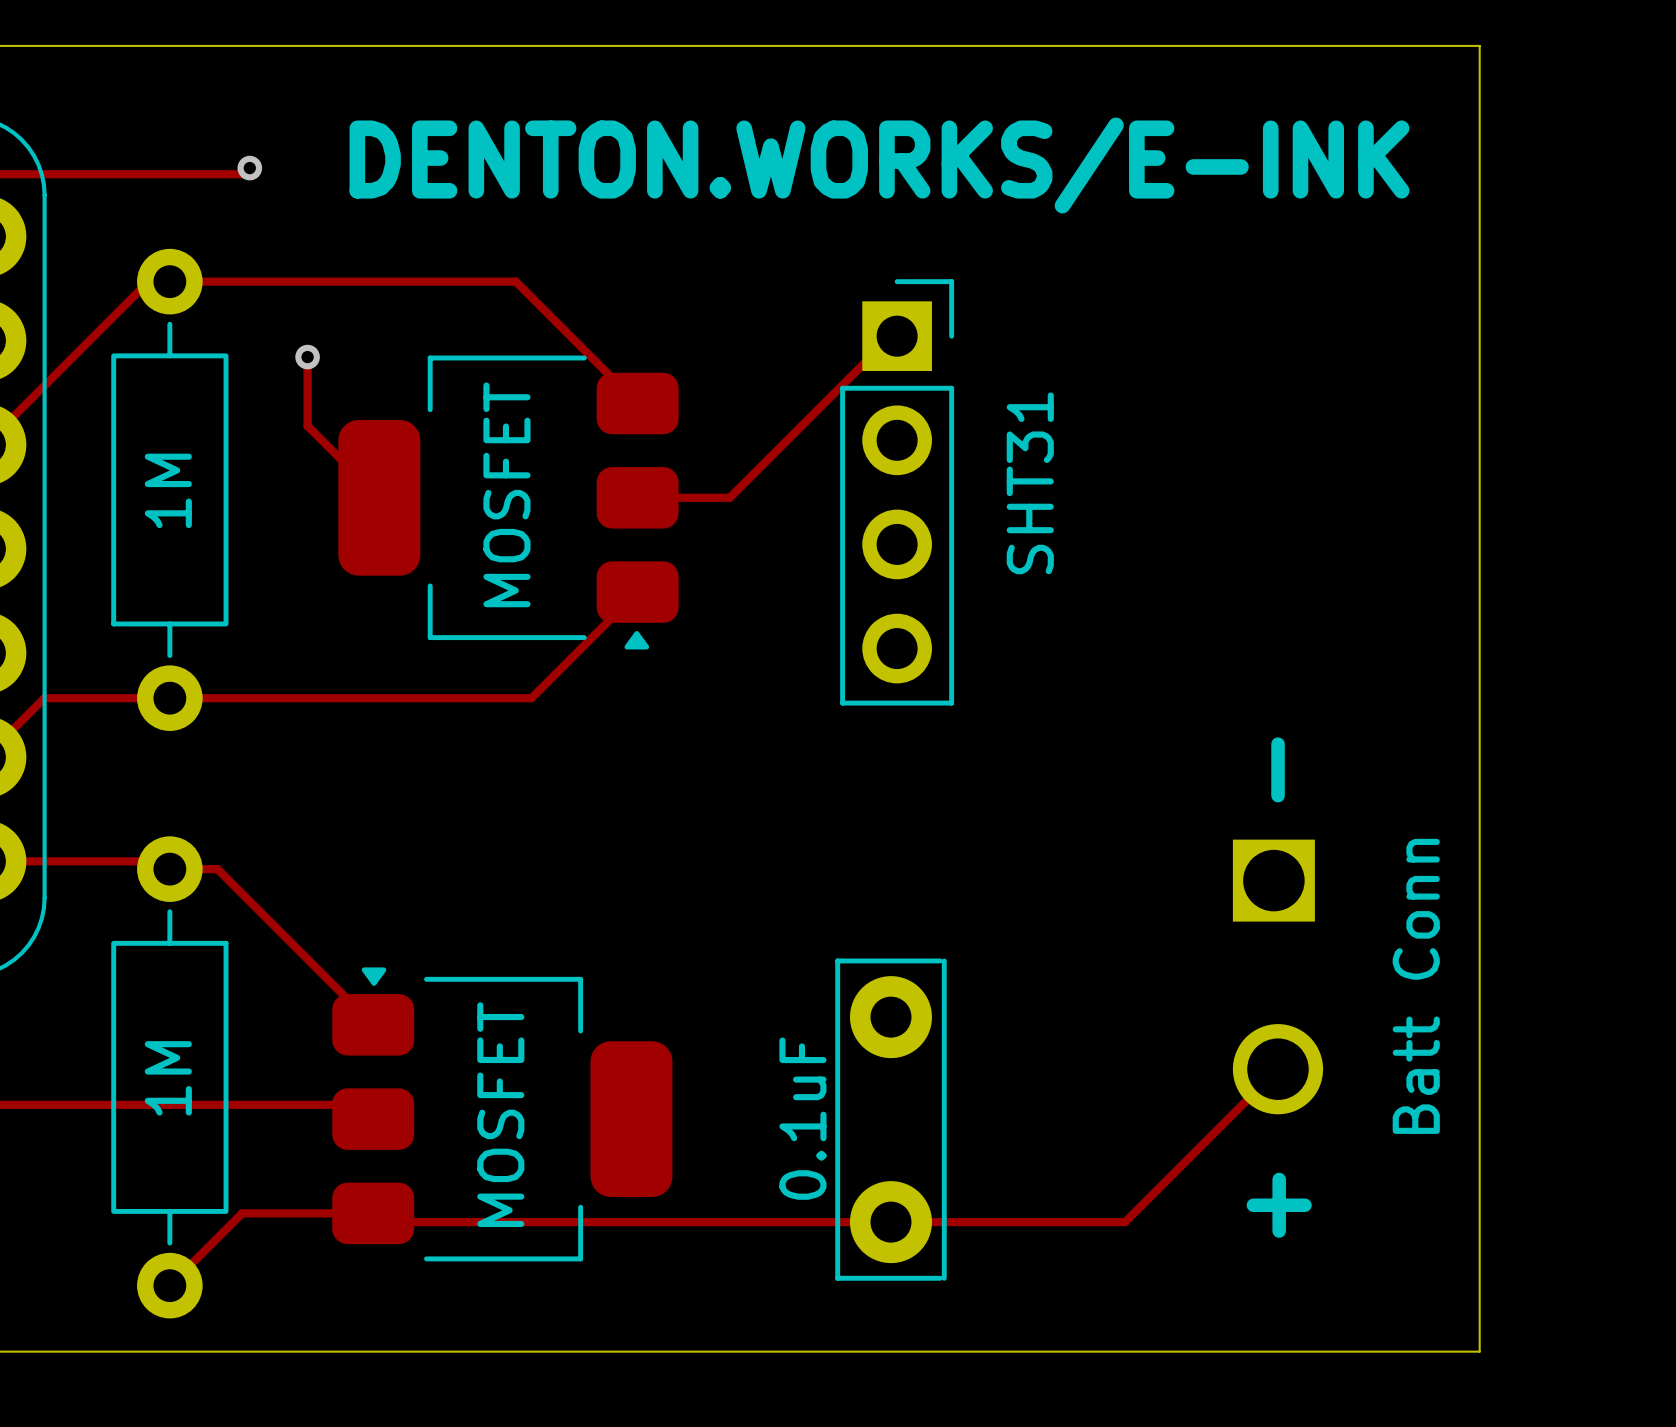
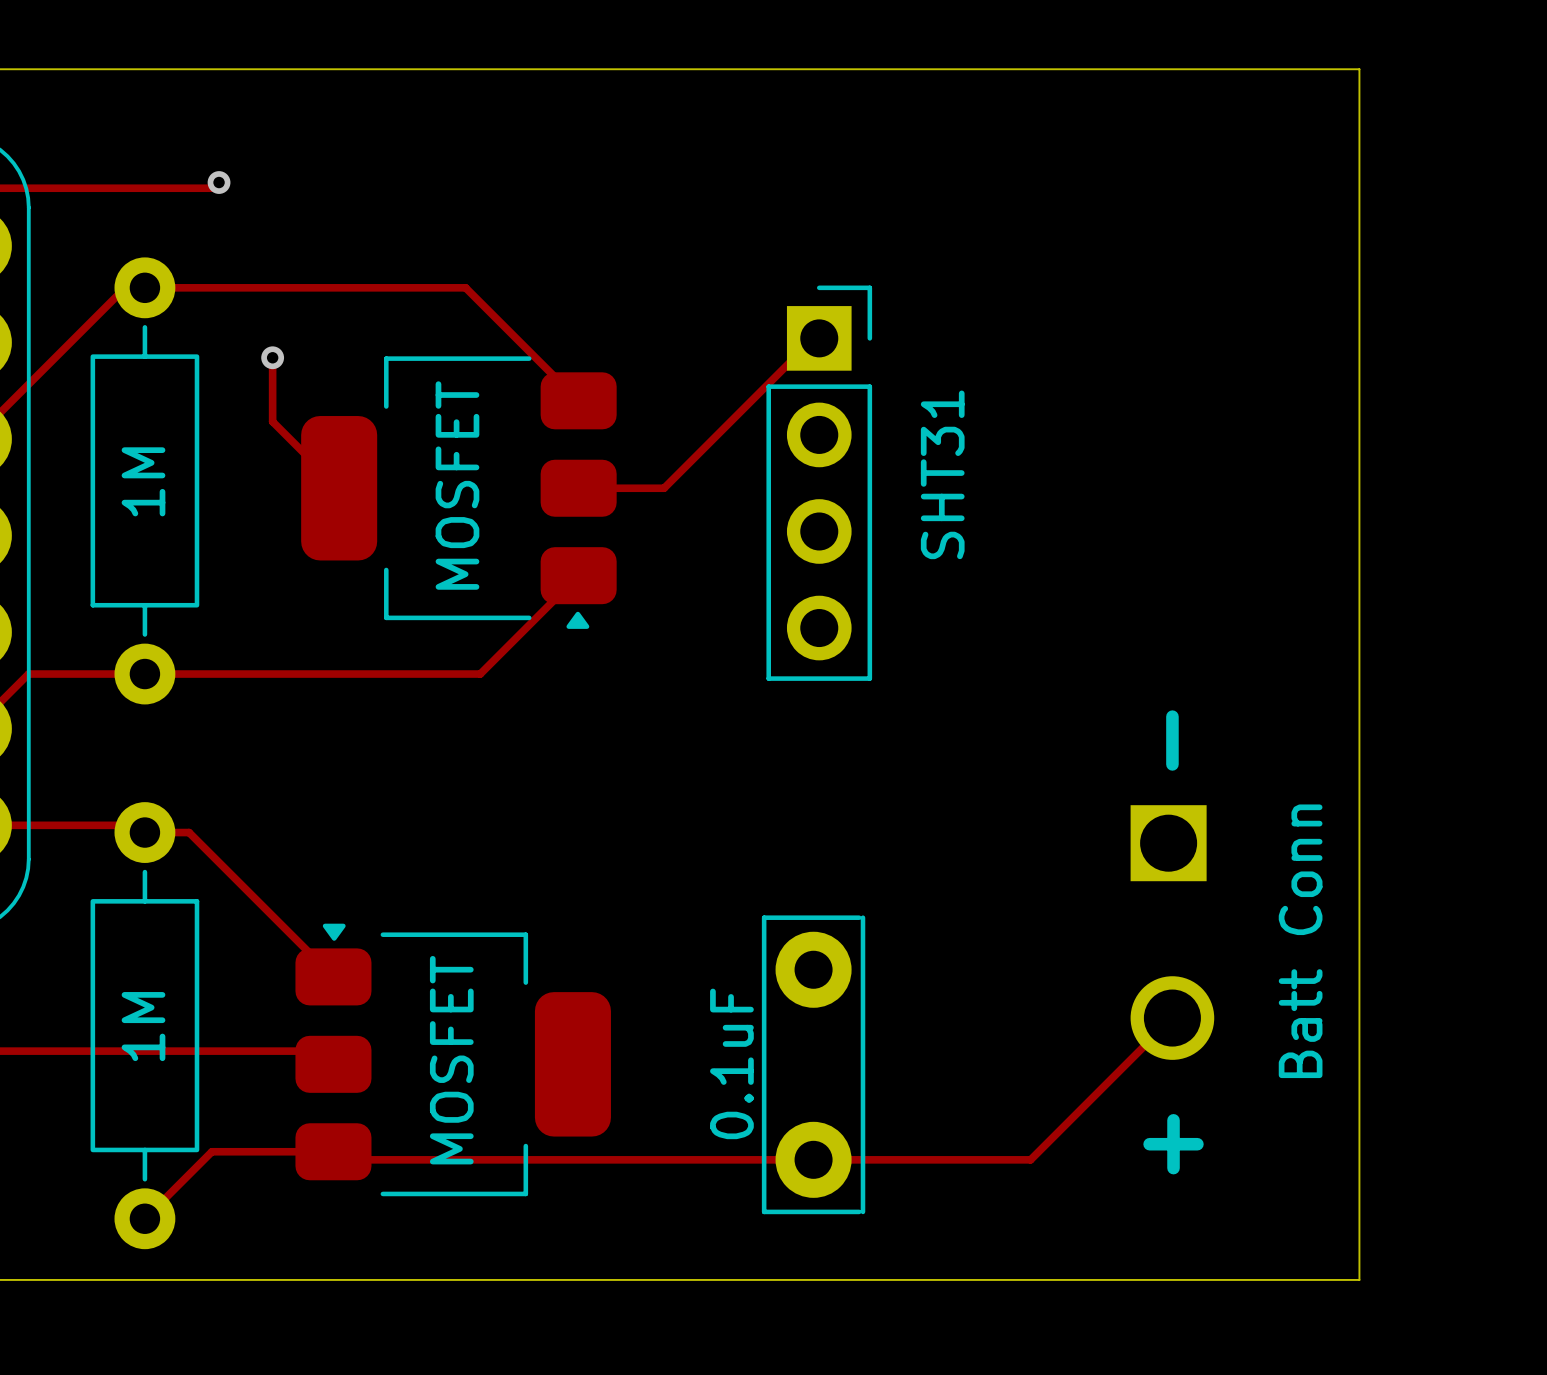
text: DENTON.WORKS/E-INK (879, 165) -> none

